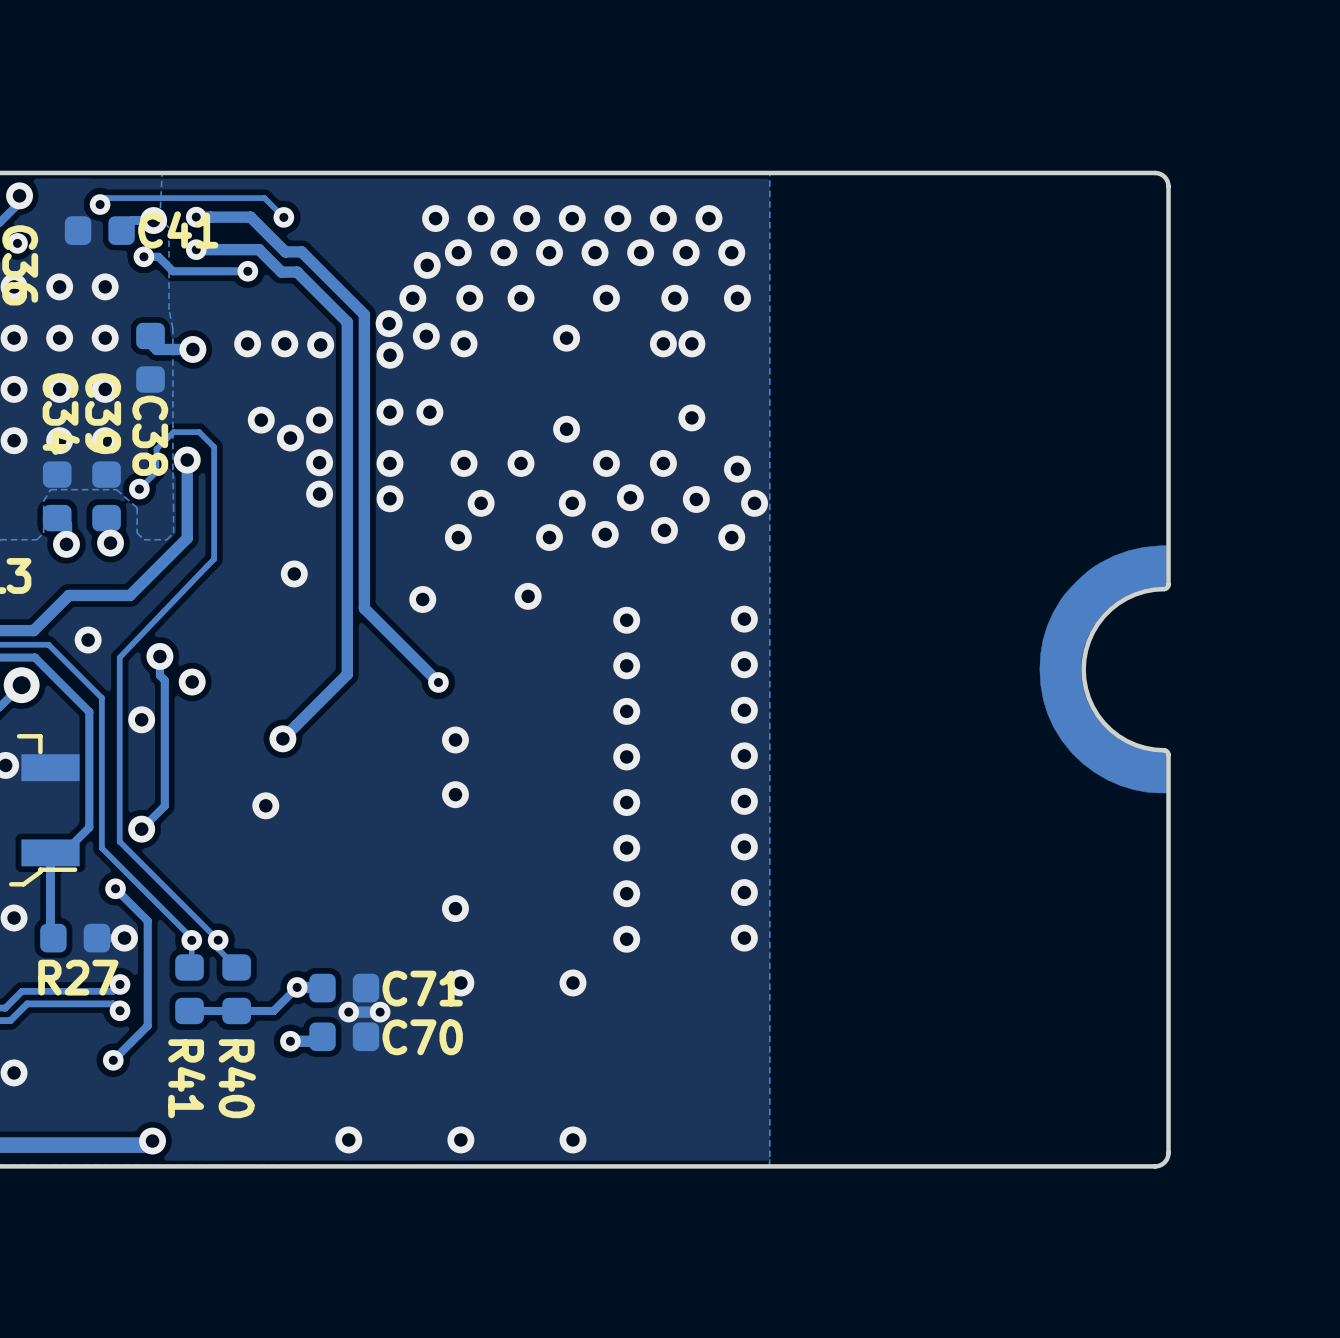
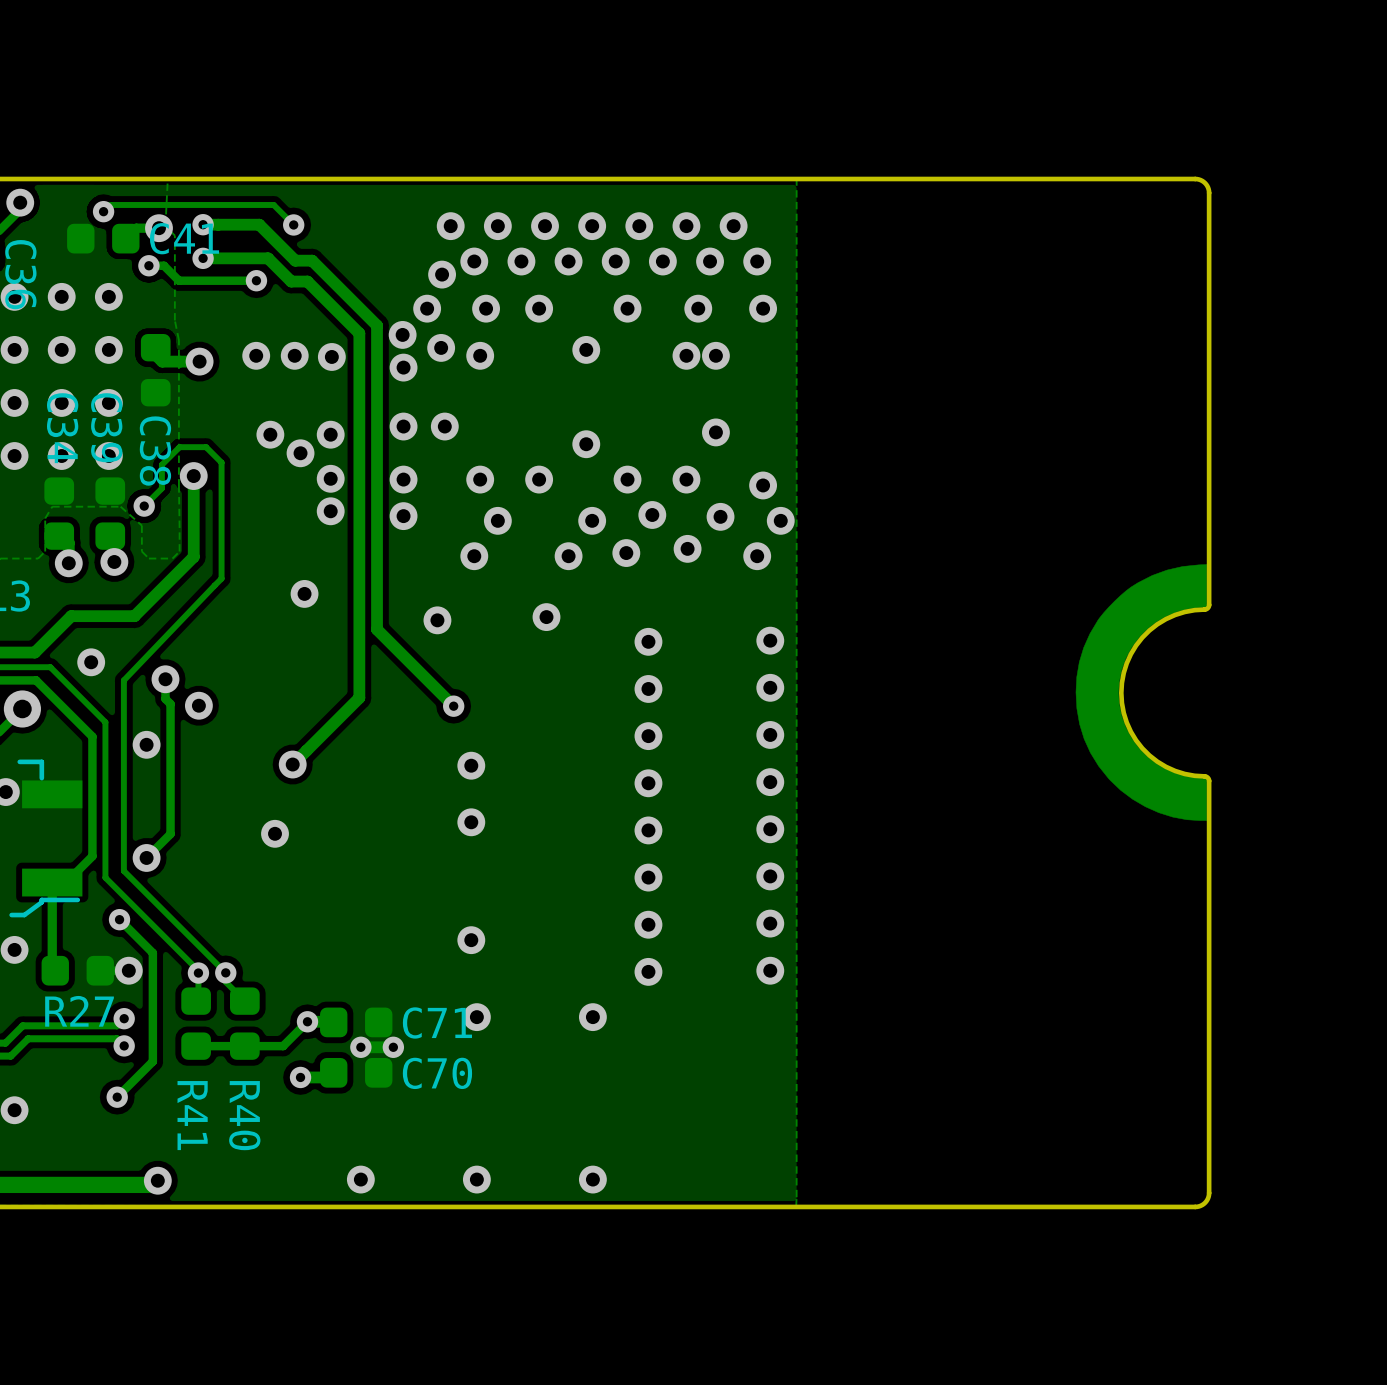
via: (17, 243) -> none

